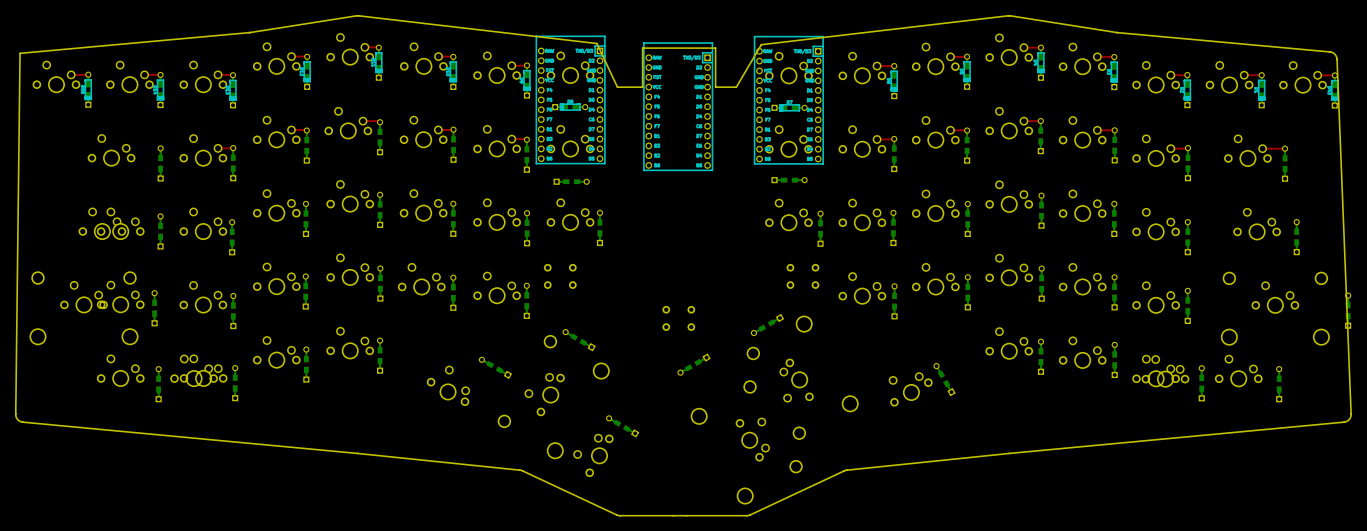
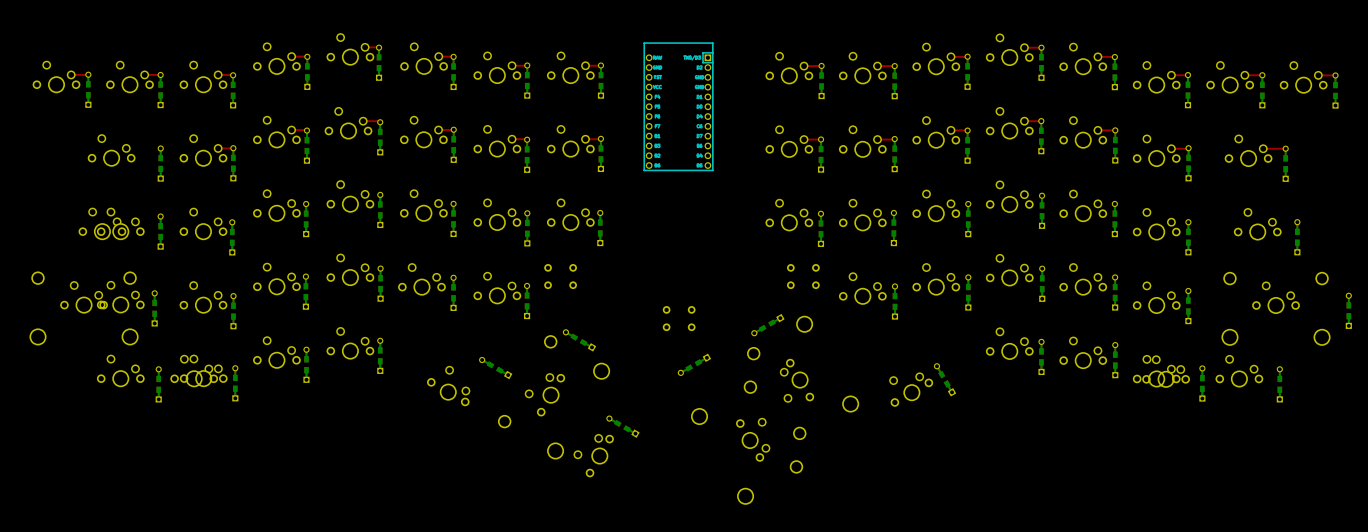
drawing: [15, 15, 1352, 517] -> none
part side: bottom (378, 62) -> top (379, 62)
part side: bottom (1040, 62) -> top (1041, 62)
top track: none -> (600, 65) (585, 65)
top track: none -> (821, 66) (804, 66)
part side: bottom (307, 71) -> top (307, 71)
part side: bottom (453, 71) -> top (453, 71)
part side: bottom (967, 71) -> top (967, 71)
part side: bottom (1114, 72) -> top (1114, 72)
part side: bottom (526, 80) -> top (527, 80)
part side: bottom (894, 81) -> top (894, 81)
part side: bottom (88, 89) -> top (88, 89)
part side: bottom (160, 89) -> top (160, 90)
part side: bottom (233, 90) -> top (233, 90)
part side: bottom (1187, 90) -> top (1187, 90)
part side: bottom (1261, 90) -> top (1262, 90)
part side: bottom (1334, 90) -> top (1335, 90)
part: (570, 99) -> none
part: (788, 100) -> none
part side: bottom (570, 107) -> top (600, 80)
part side: bottom (789, 107) -> top (821, 80)
top track: none -> (600, 139) (585, 139)
top track: none -> (821, 139) (804, 139)
part rotation: 0° (789, 180) -> 90° counterclockwise (821, 154)
part position: (789, 180) -> (821, 154)
part rotation: 0° (571, 181) -> 90° counterclockwise (600, 153)
part position: (571, 181) -> (600, 153)

